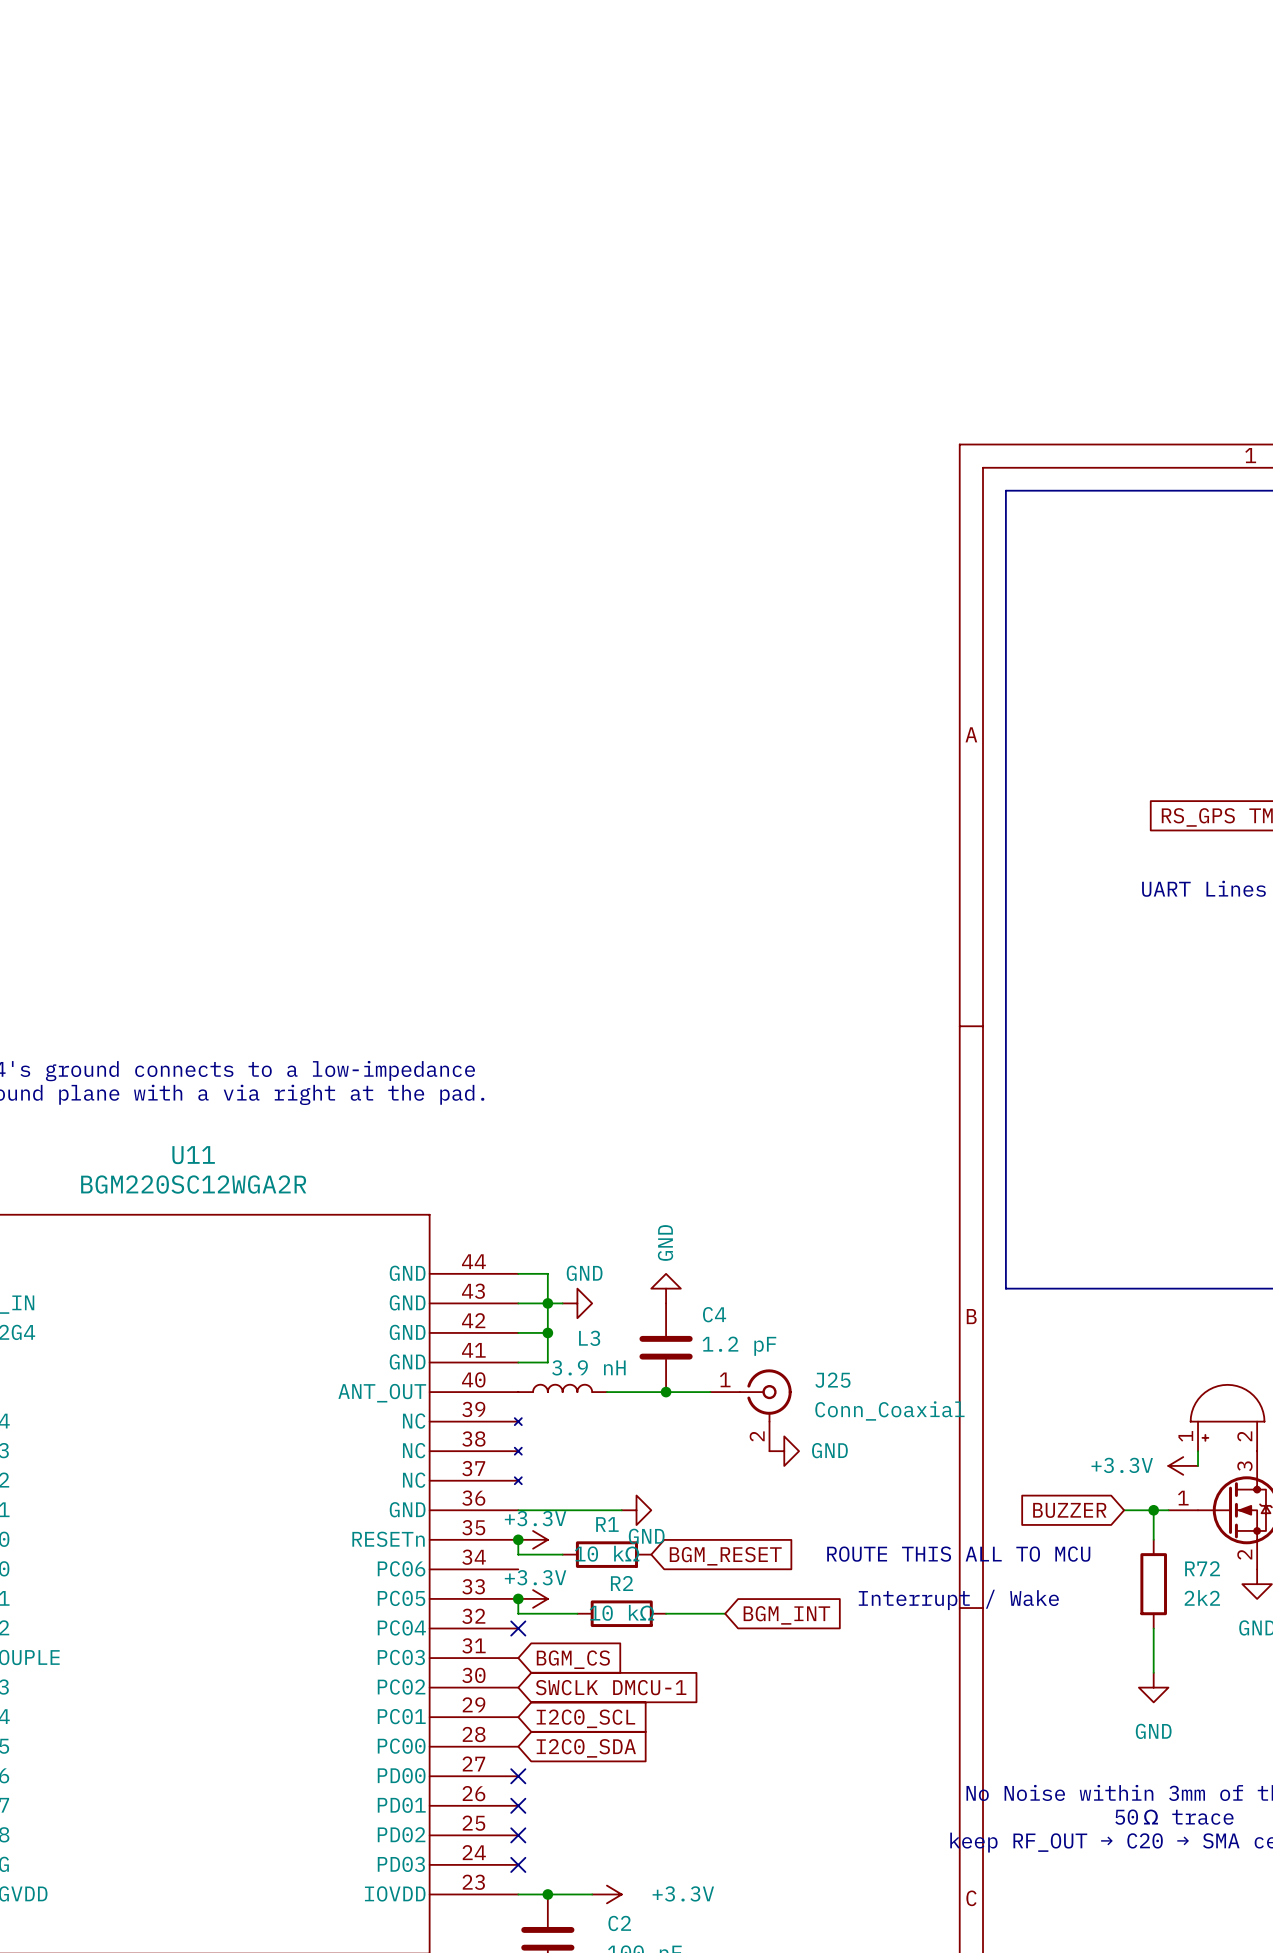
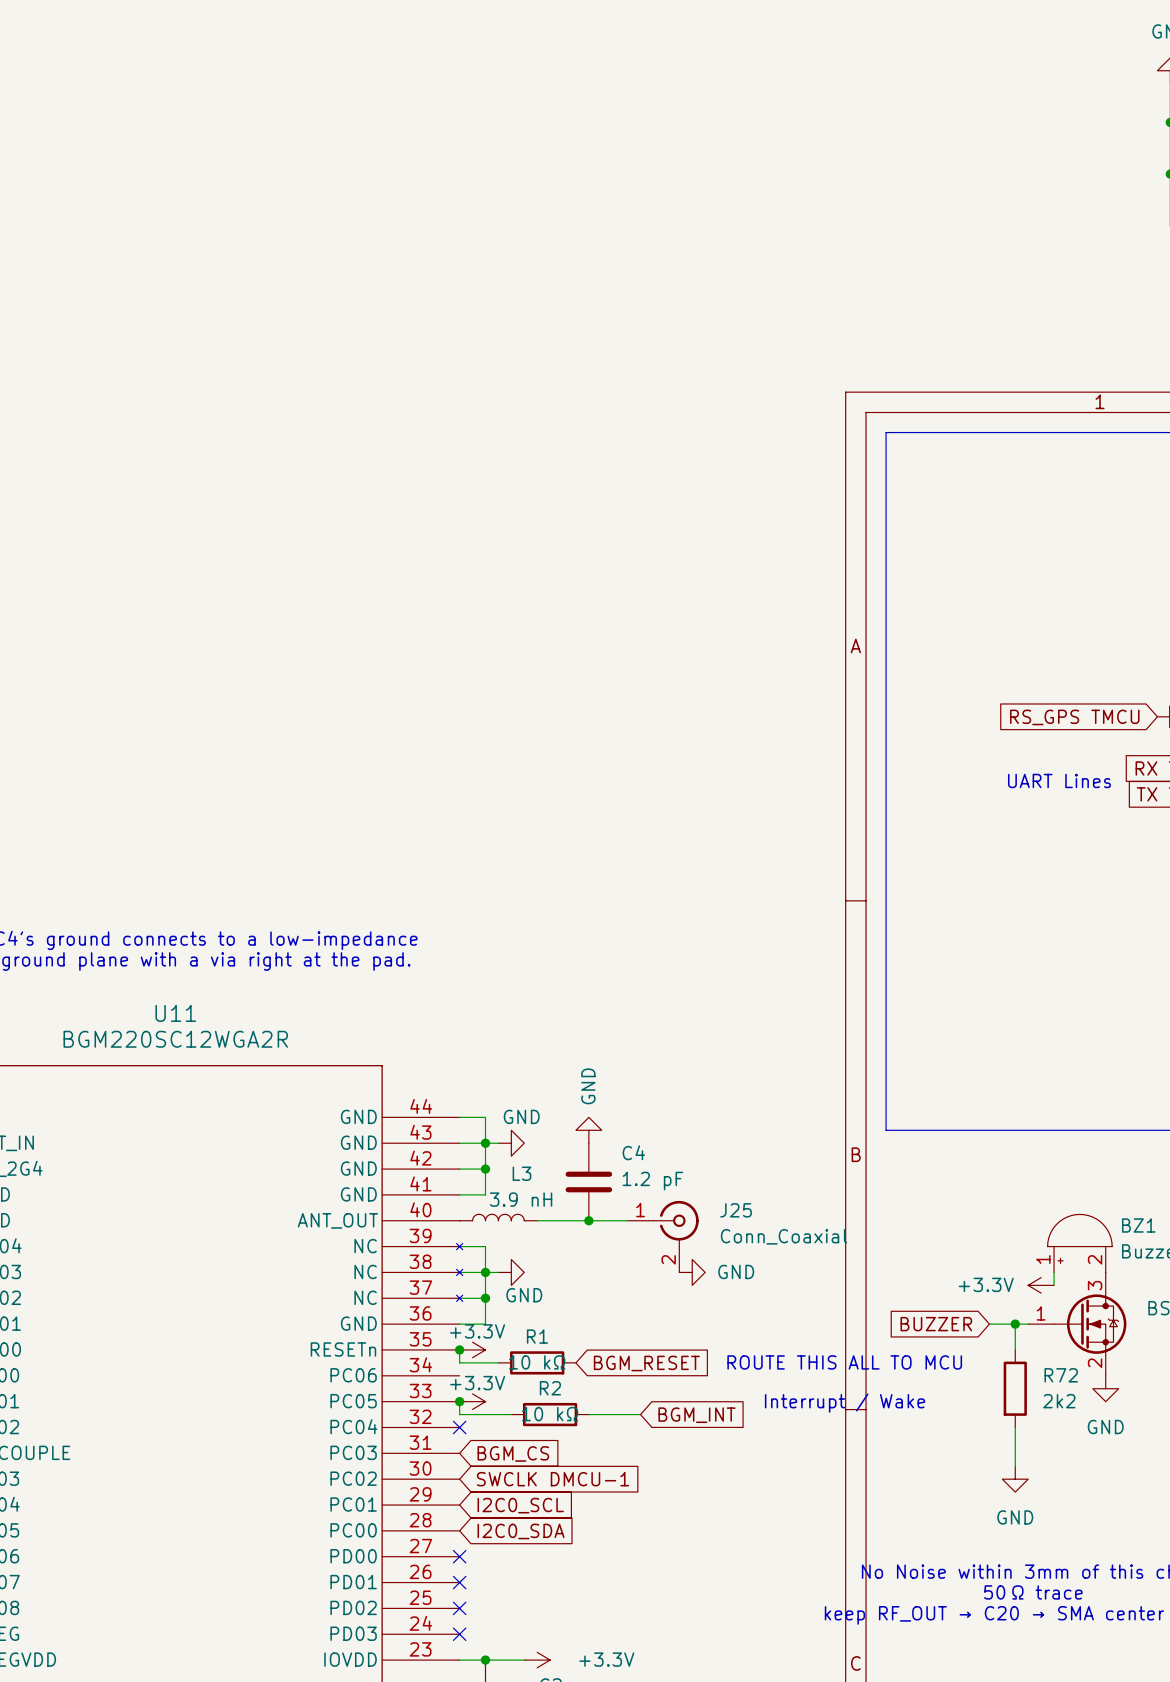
wire: none -> (459, 1272) (498, 1272)
junction: none -> (485, 1272)
wire: none -> (459, 1298) (485, 1298)
junction: none -> (485, 1298)
wire: (547, 1510) (621, 1510) -> (485, 1324) (485, 1246) (459, 1246)
power symbol position: GND (636, 1510) -> GND (511, 1272)

